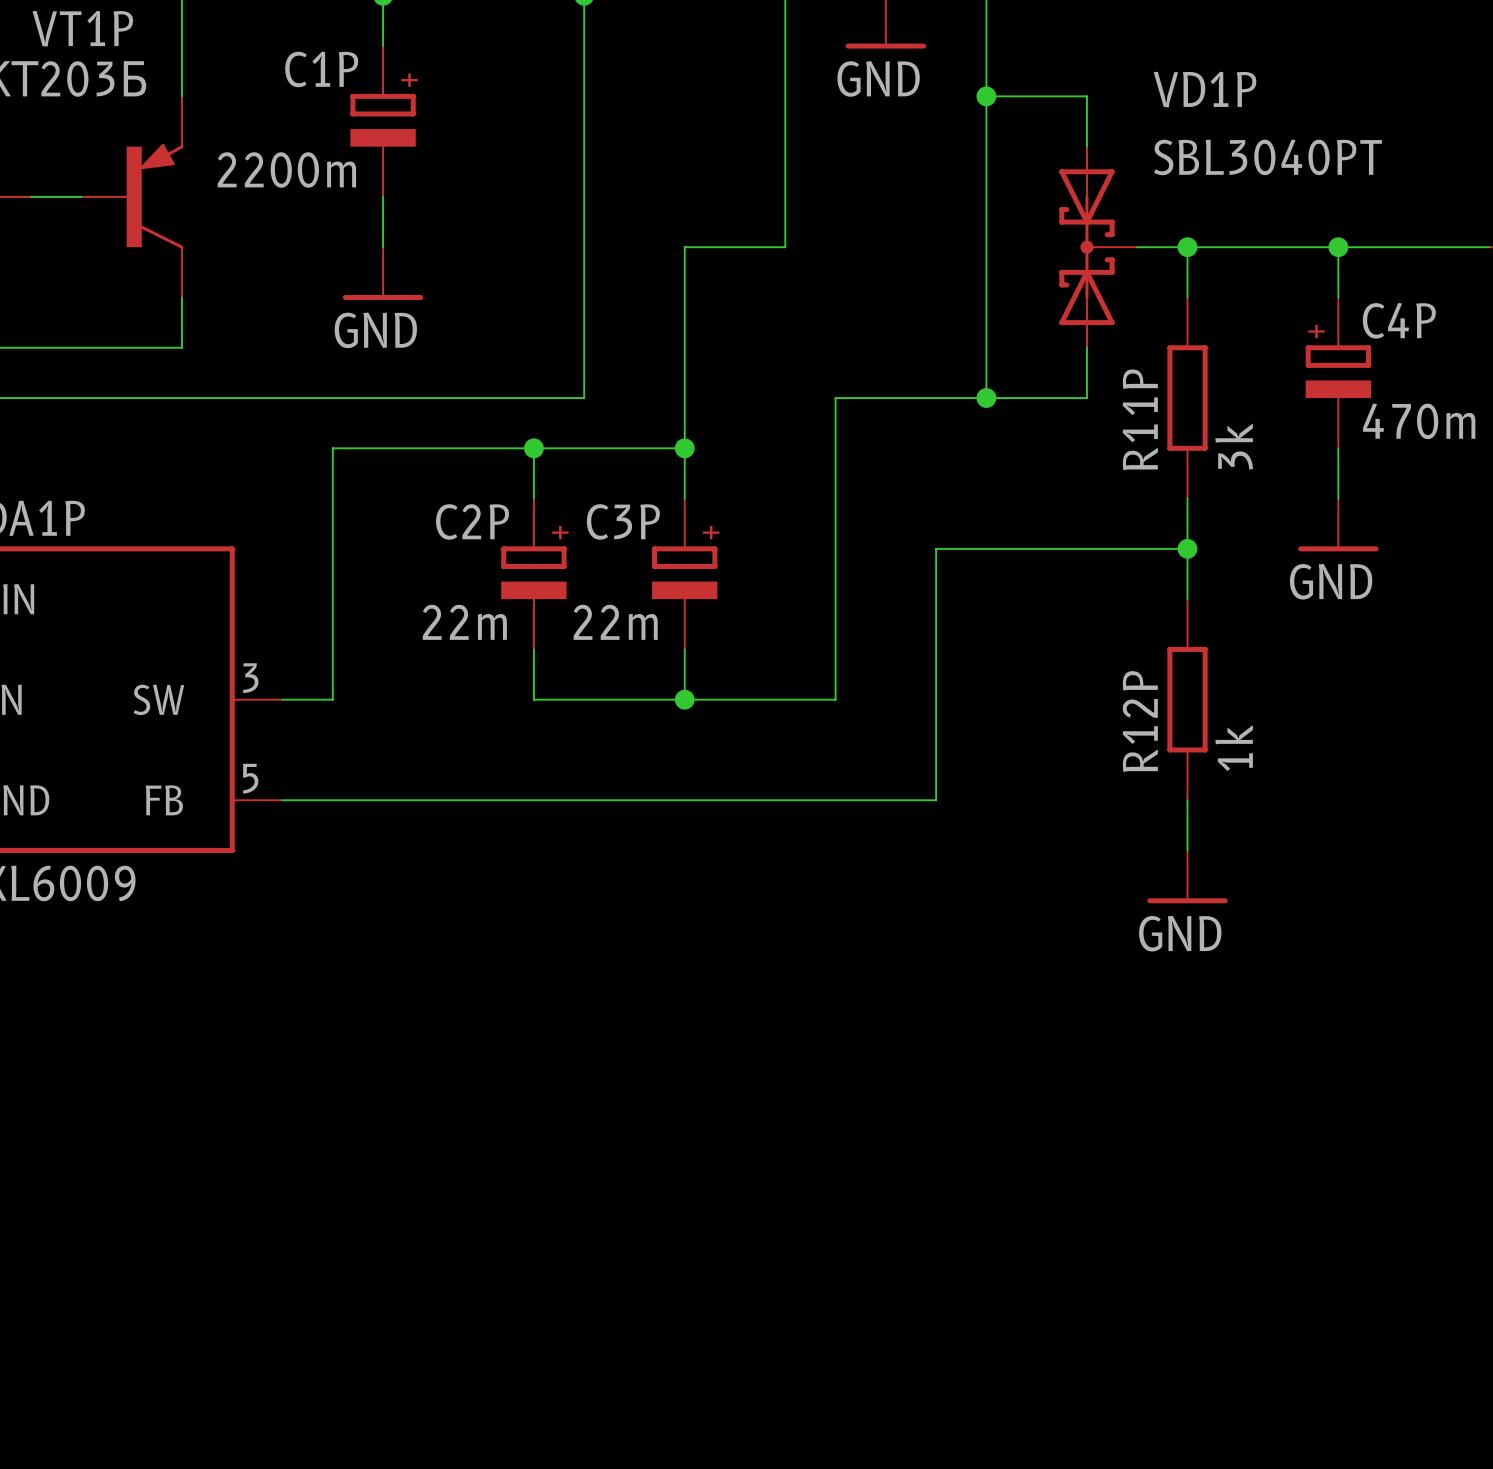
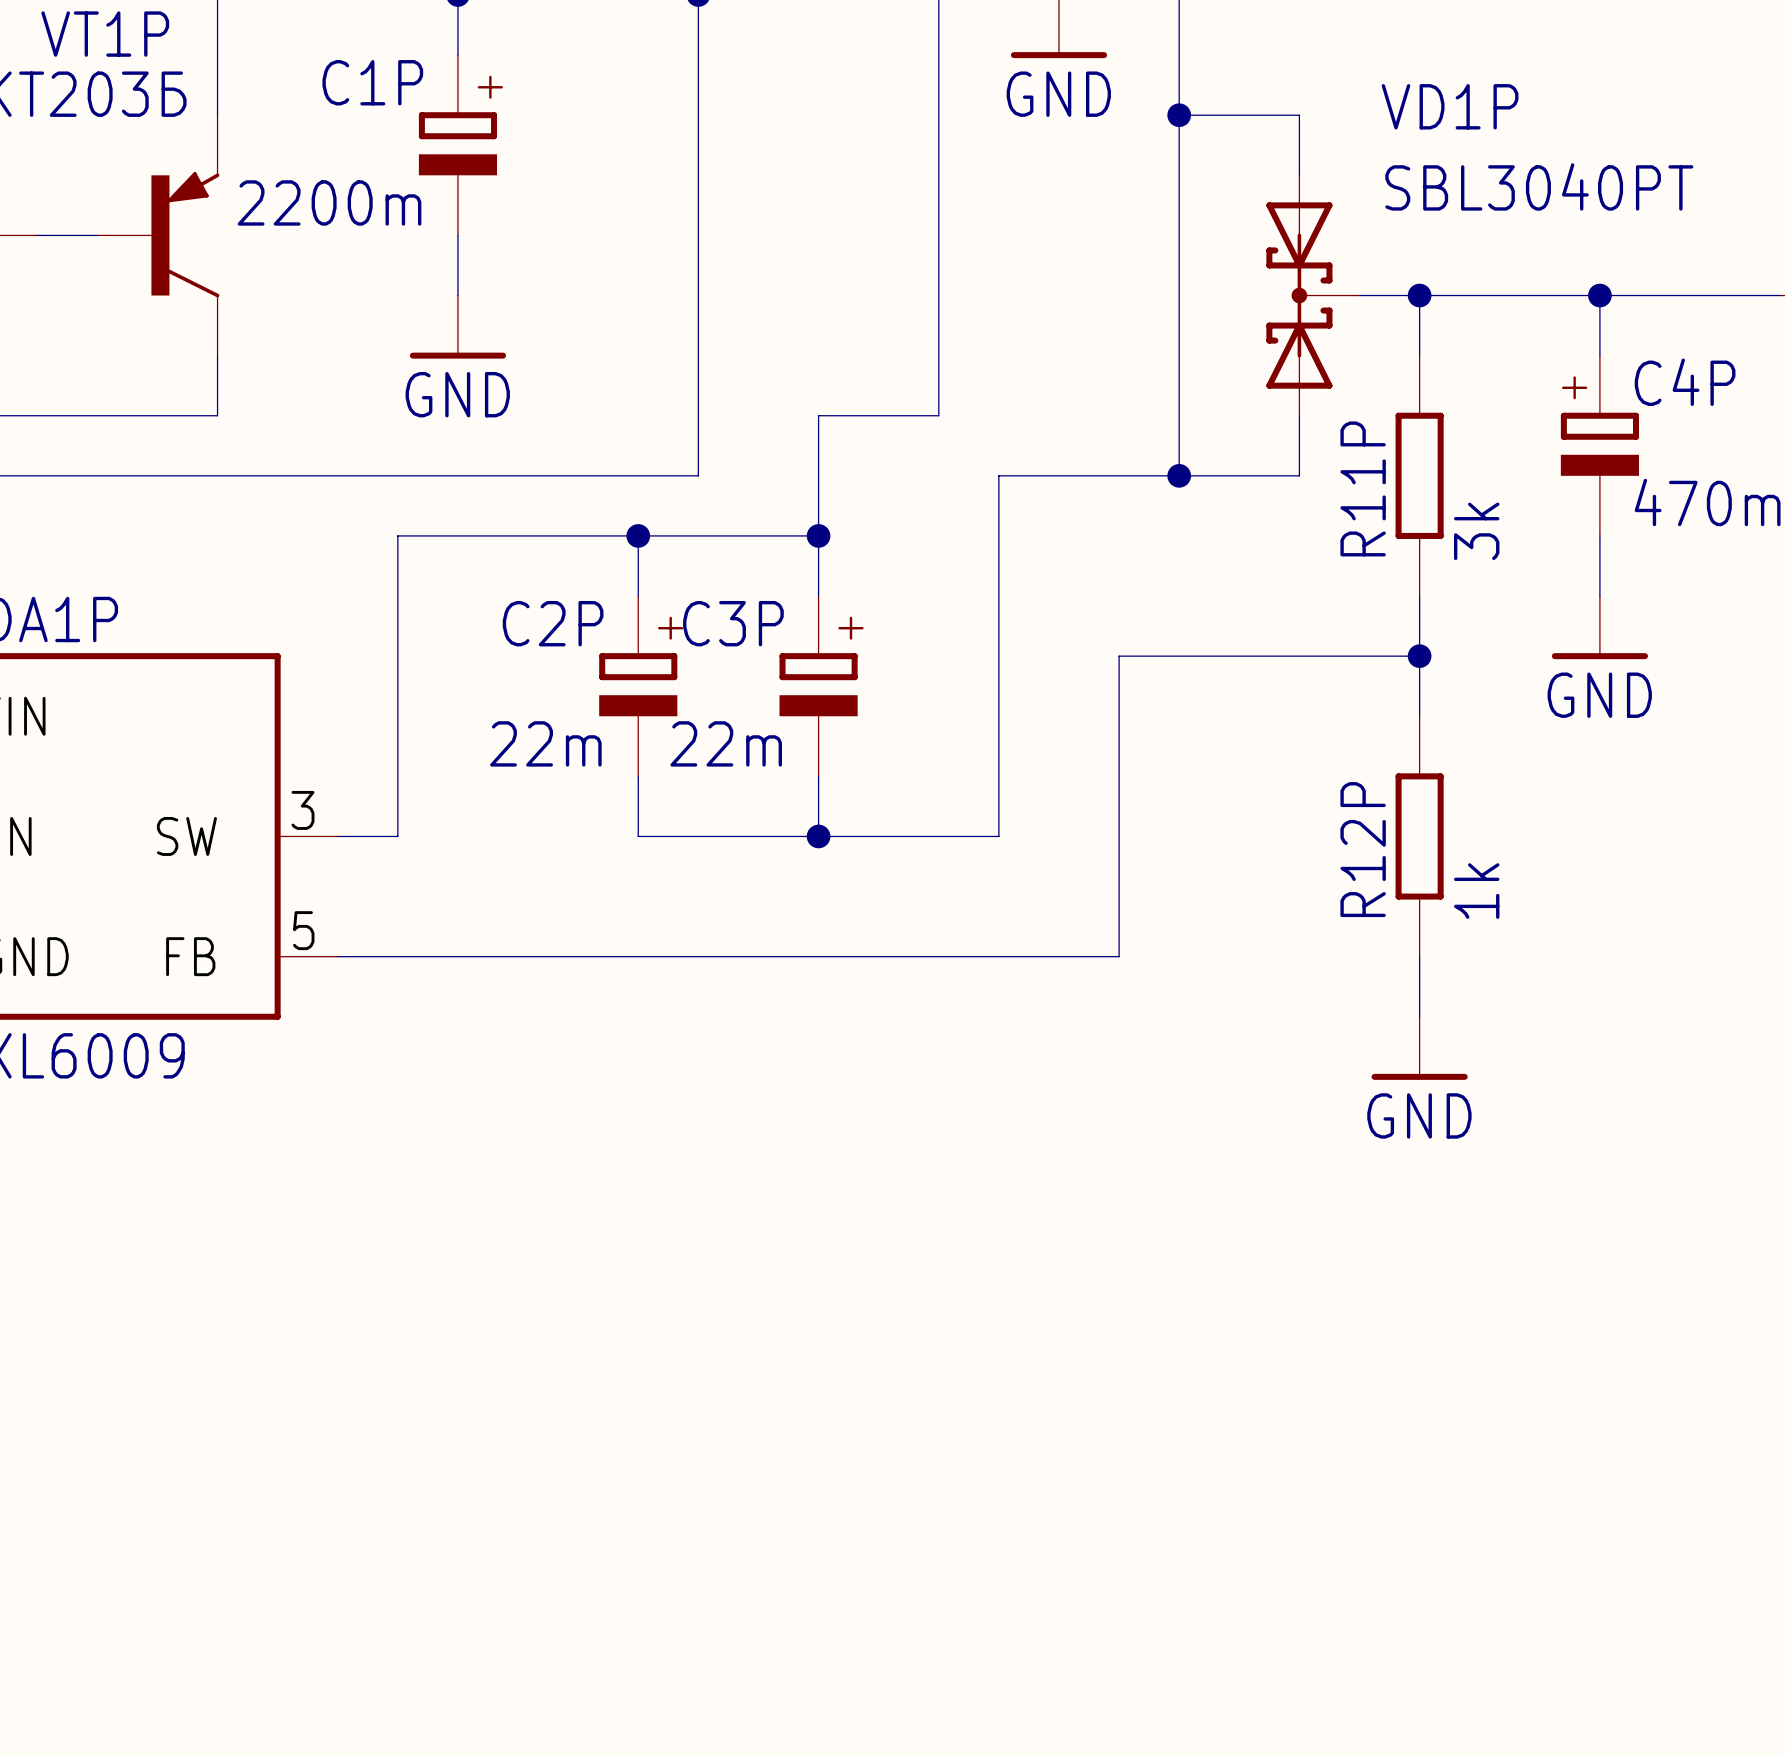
wire: (785, 247) (684, 247) (684, 347) -> (938, 295) (938, 415) (818, 415)

